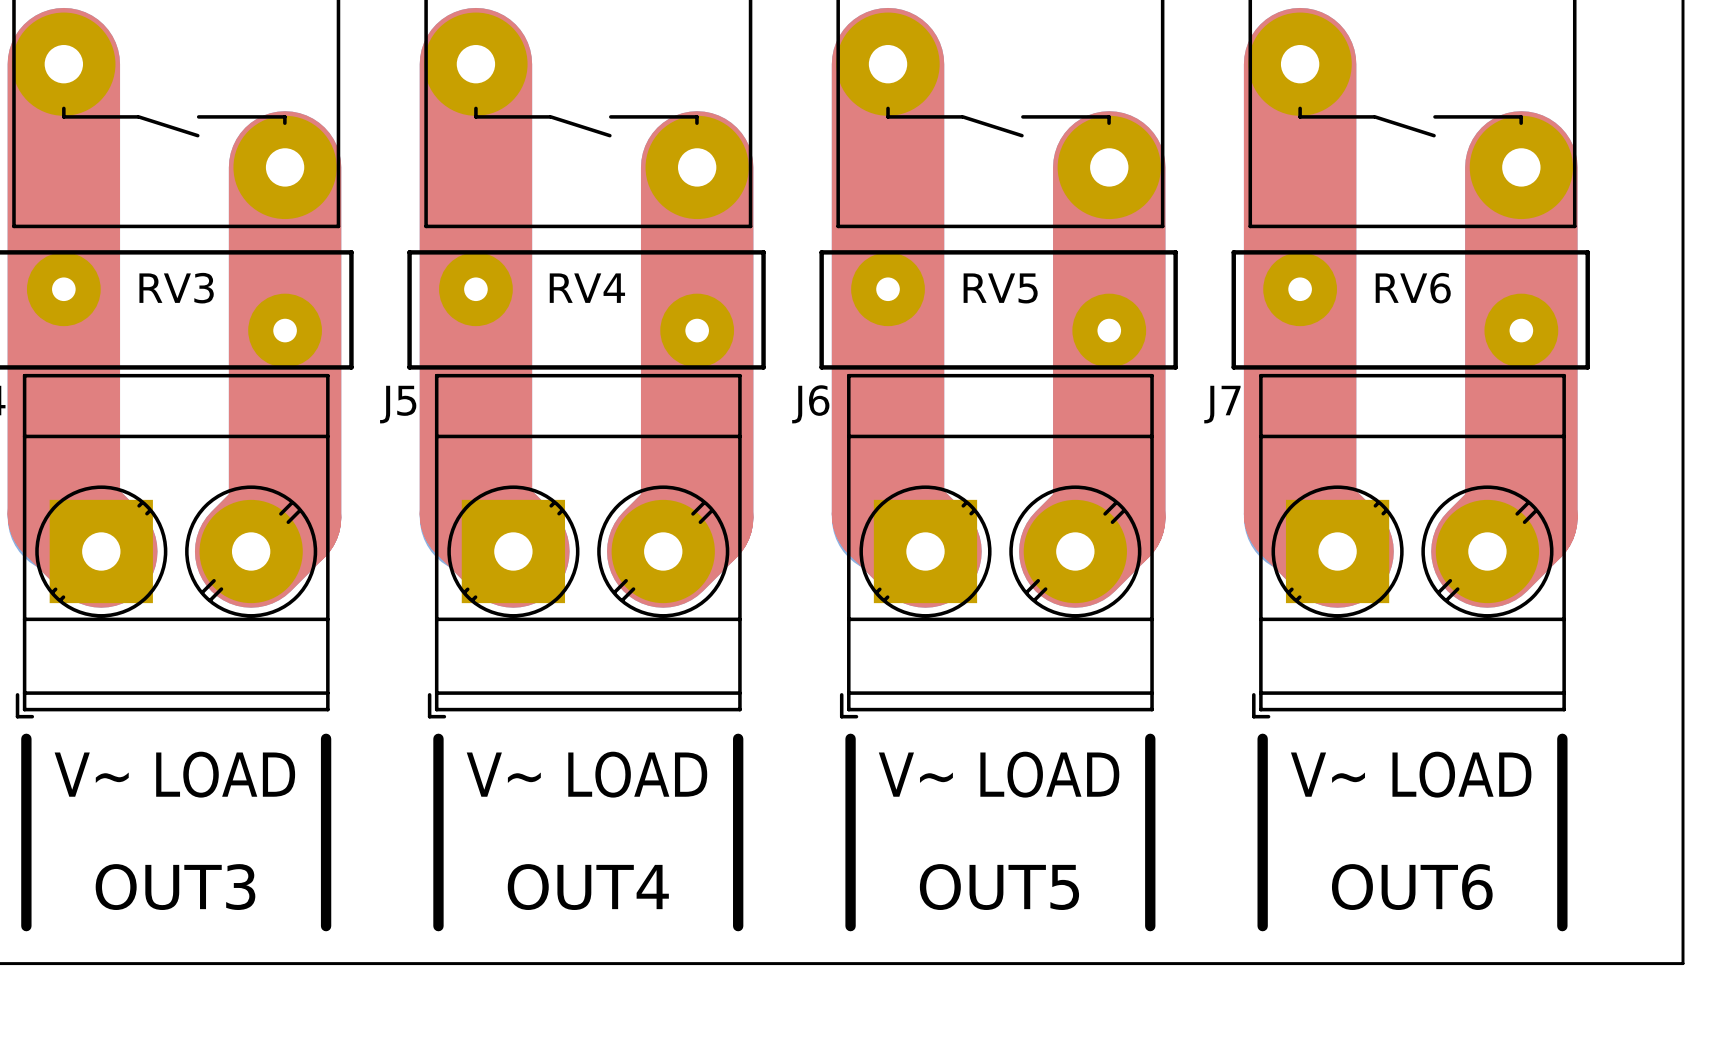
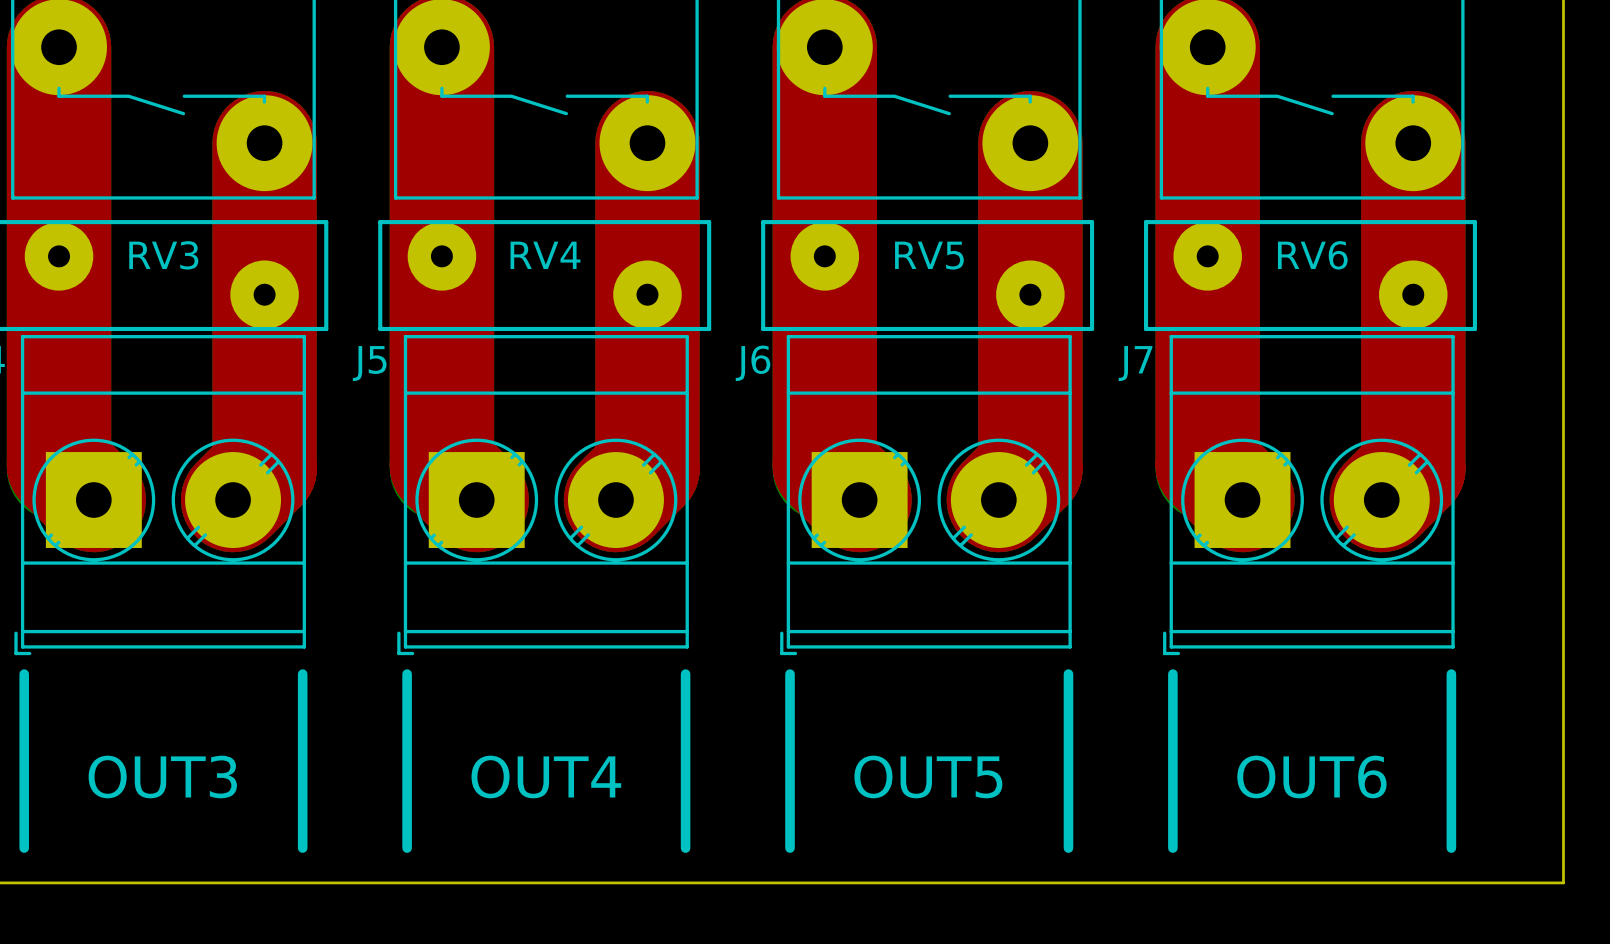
text: V~ LOAD (174, 774) -> none
text: V~ LOAD (586, 774) -> none
text: V~ LOAD (999, 774) -> none
text: V~ LOAD (1411, 774) -> none
text position: OUT3 (175, 887) -> OUT3 (162, 776)
text position: OUT4 (588, 887) -> OUT4 (546, 776)
text position: OUT5 (999, 887) -> OUT5 (928, 776)
text position: OUT6 (1412, 887) -> OUT6 (1311, 776)

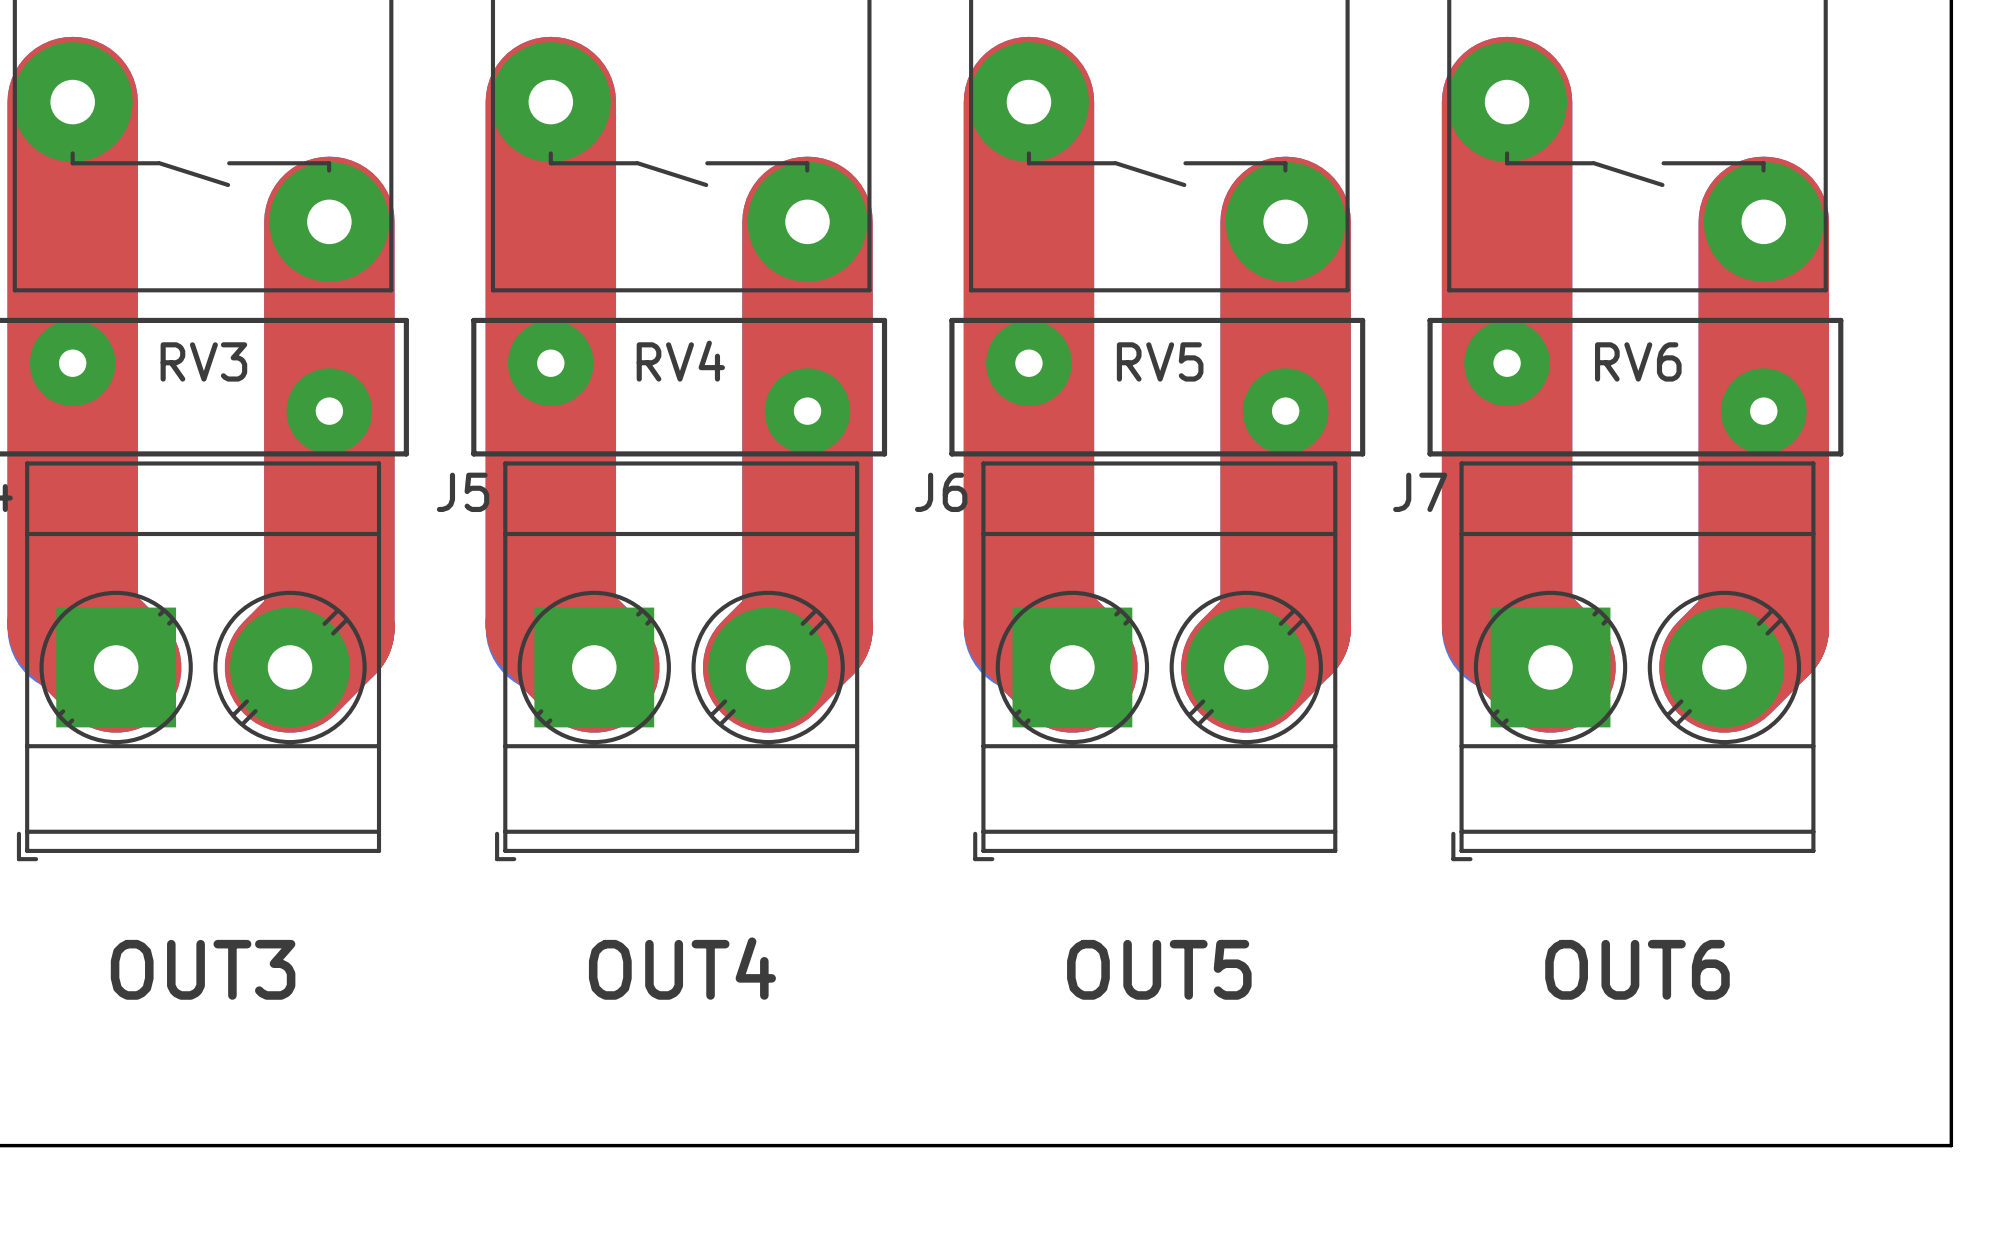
line: (24, 674) (24, 848) -> none
line: (302, 674) (302, 848) -> none
line: (407, 674) (407, 848) -> none
line: (685, 674) (685, 848) -> none
line: (790, 674) (790, 848) -> none
line: (1068, 674) (1068, 848) -> none
line: (1172, 674) (1172, 848) -> none
line: (1451, 674) (1451, 848) -> none
text position: OUT3 (162, 776) -> OUT3 (203, 969)
text position: OUT4 (546, 776) -> OUT4 (682, 968)
text position: OUT5 (928, 776) -> OUT5 (1159, 969)
text position: OUT6 (1311, 776) -> OUT6 (1637, 969)

